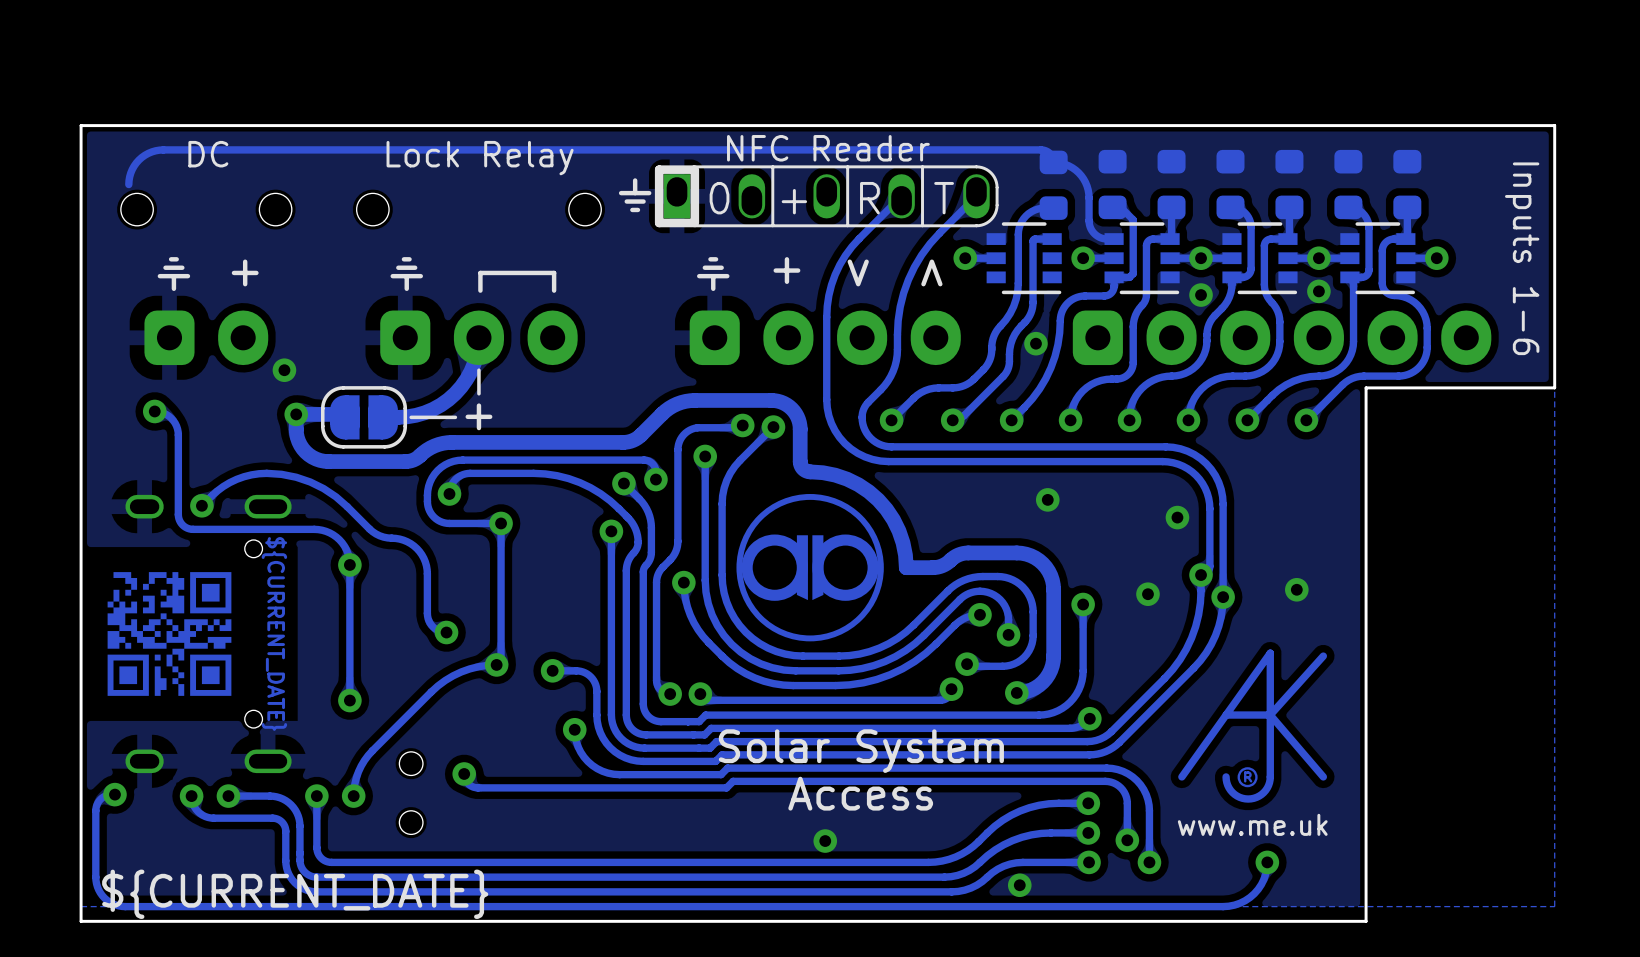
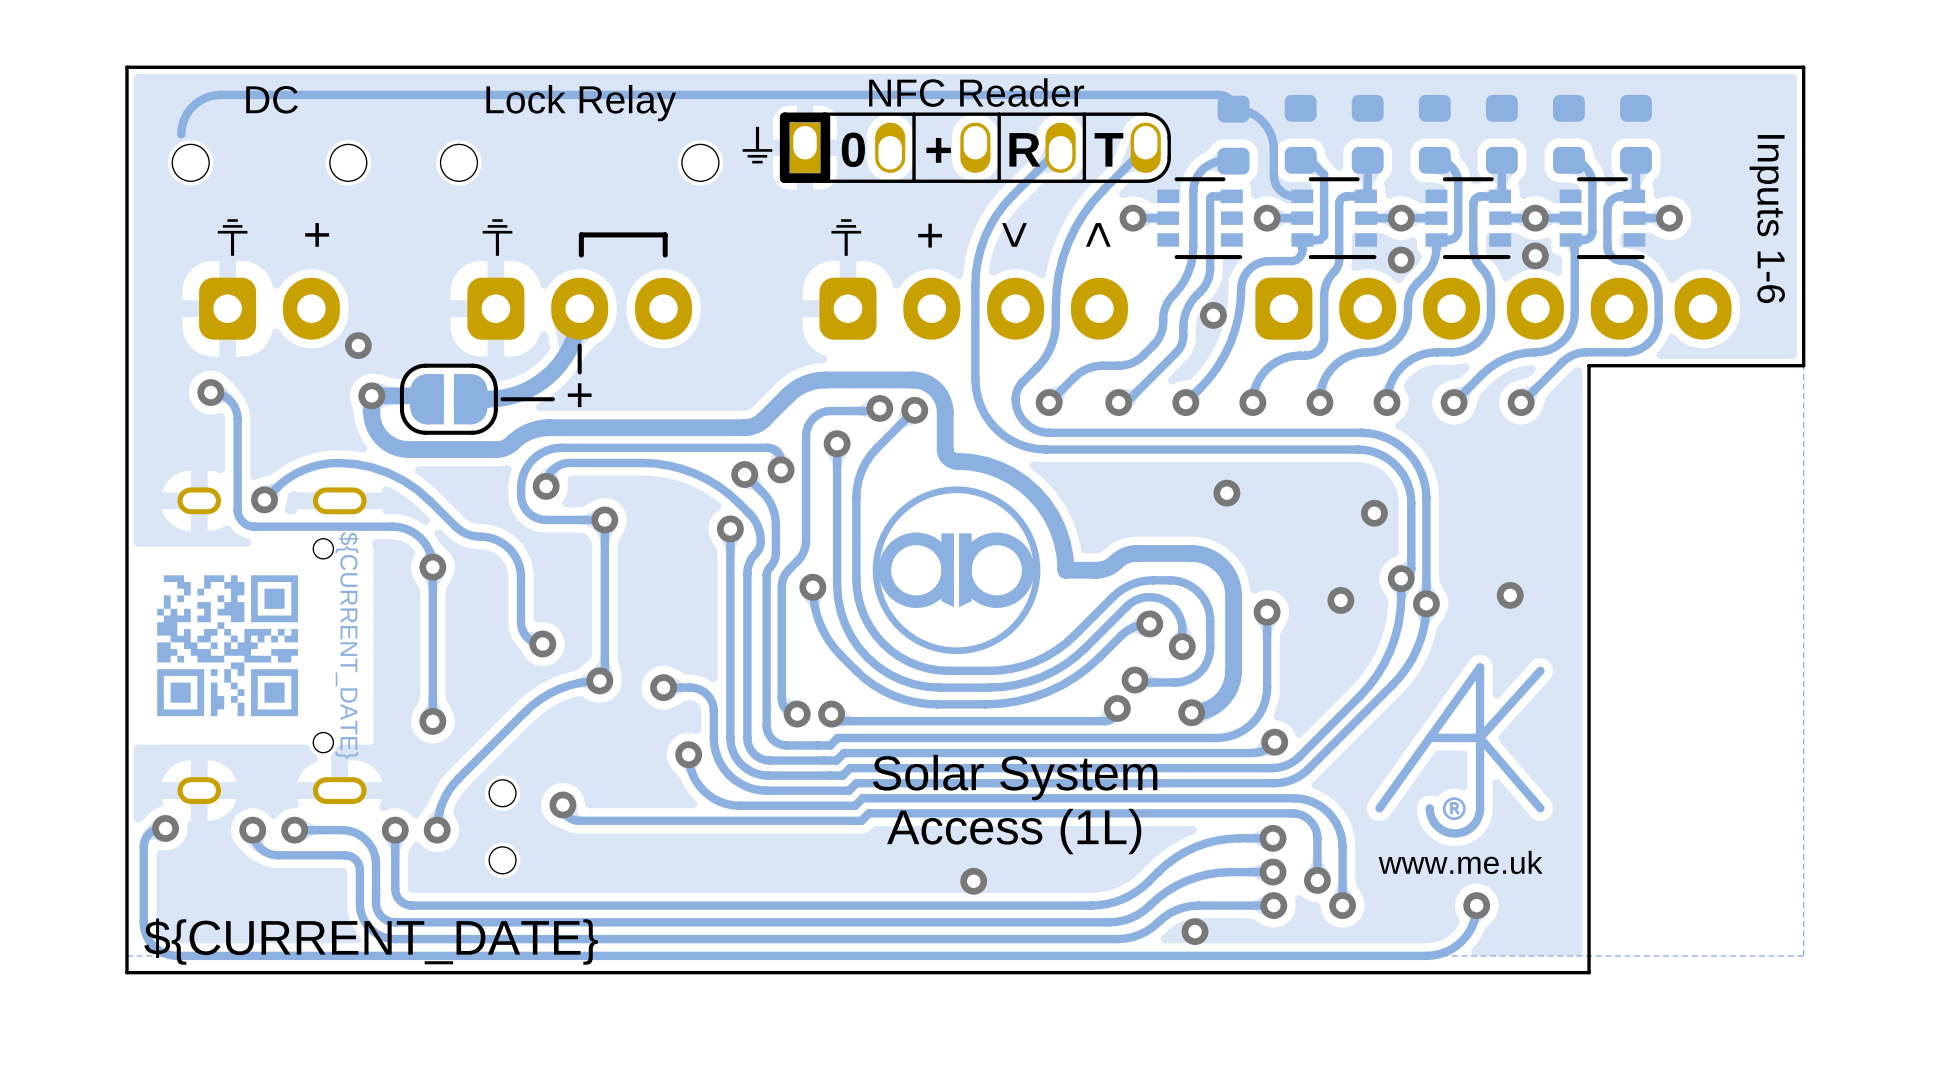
text: Access (860, 793) -> Access (1L) (1014, 831)

